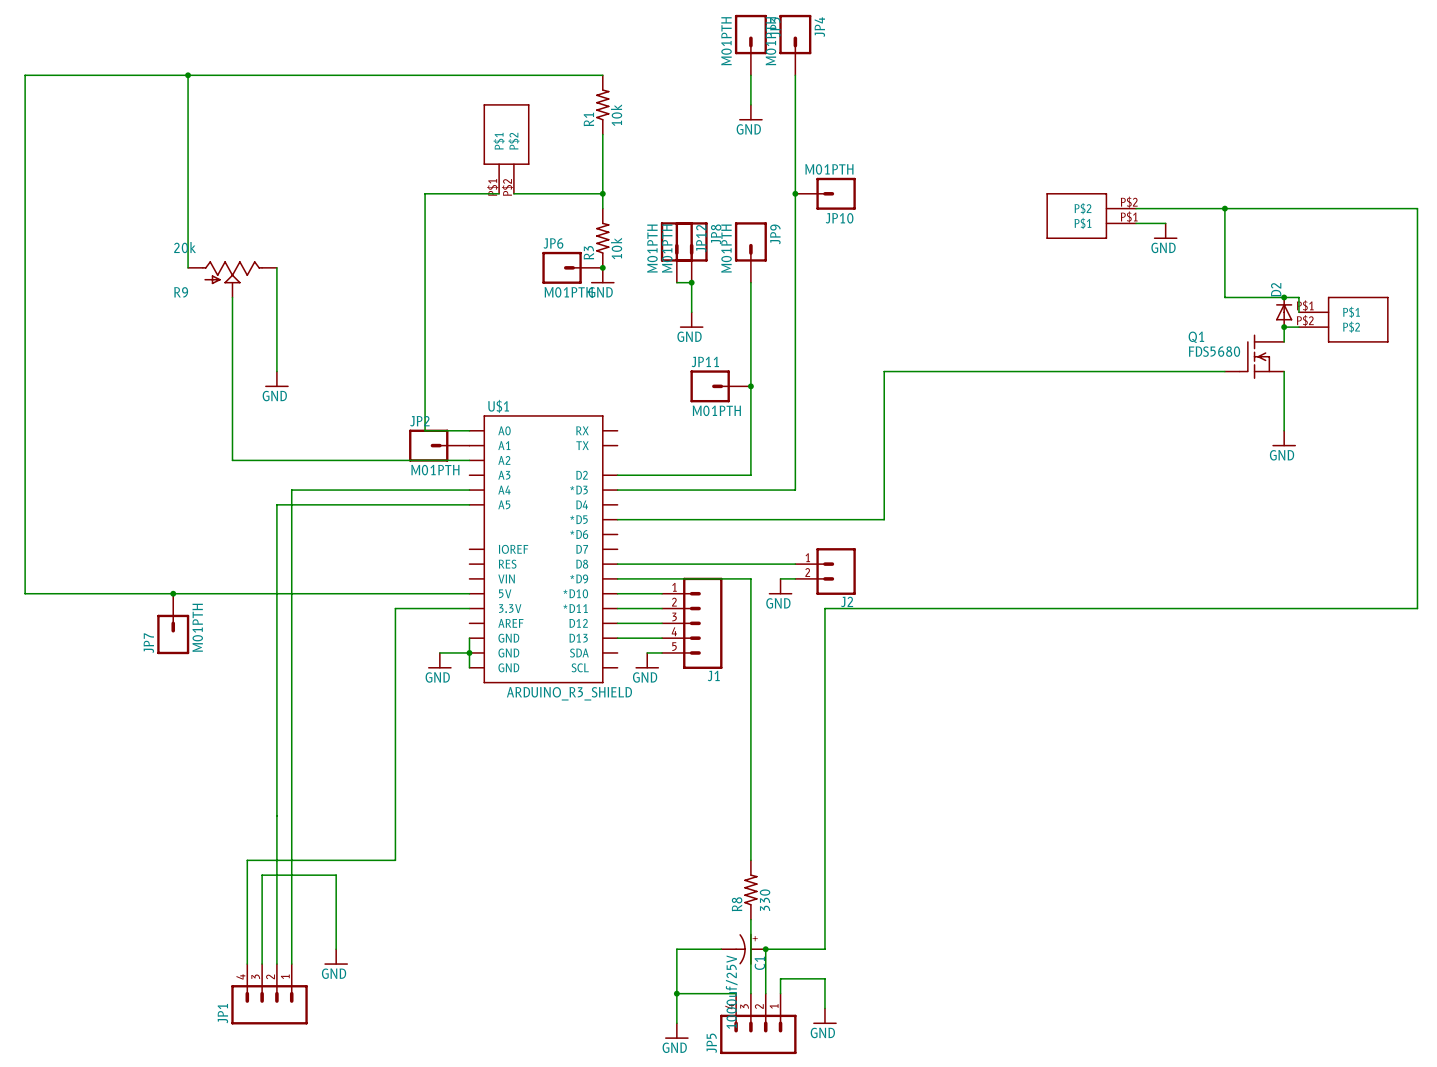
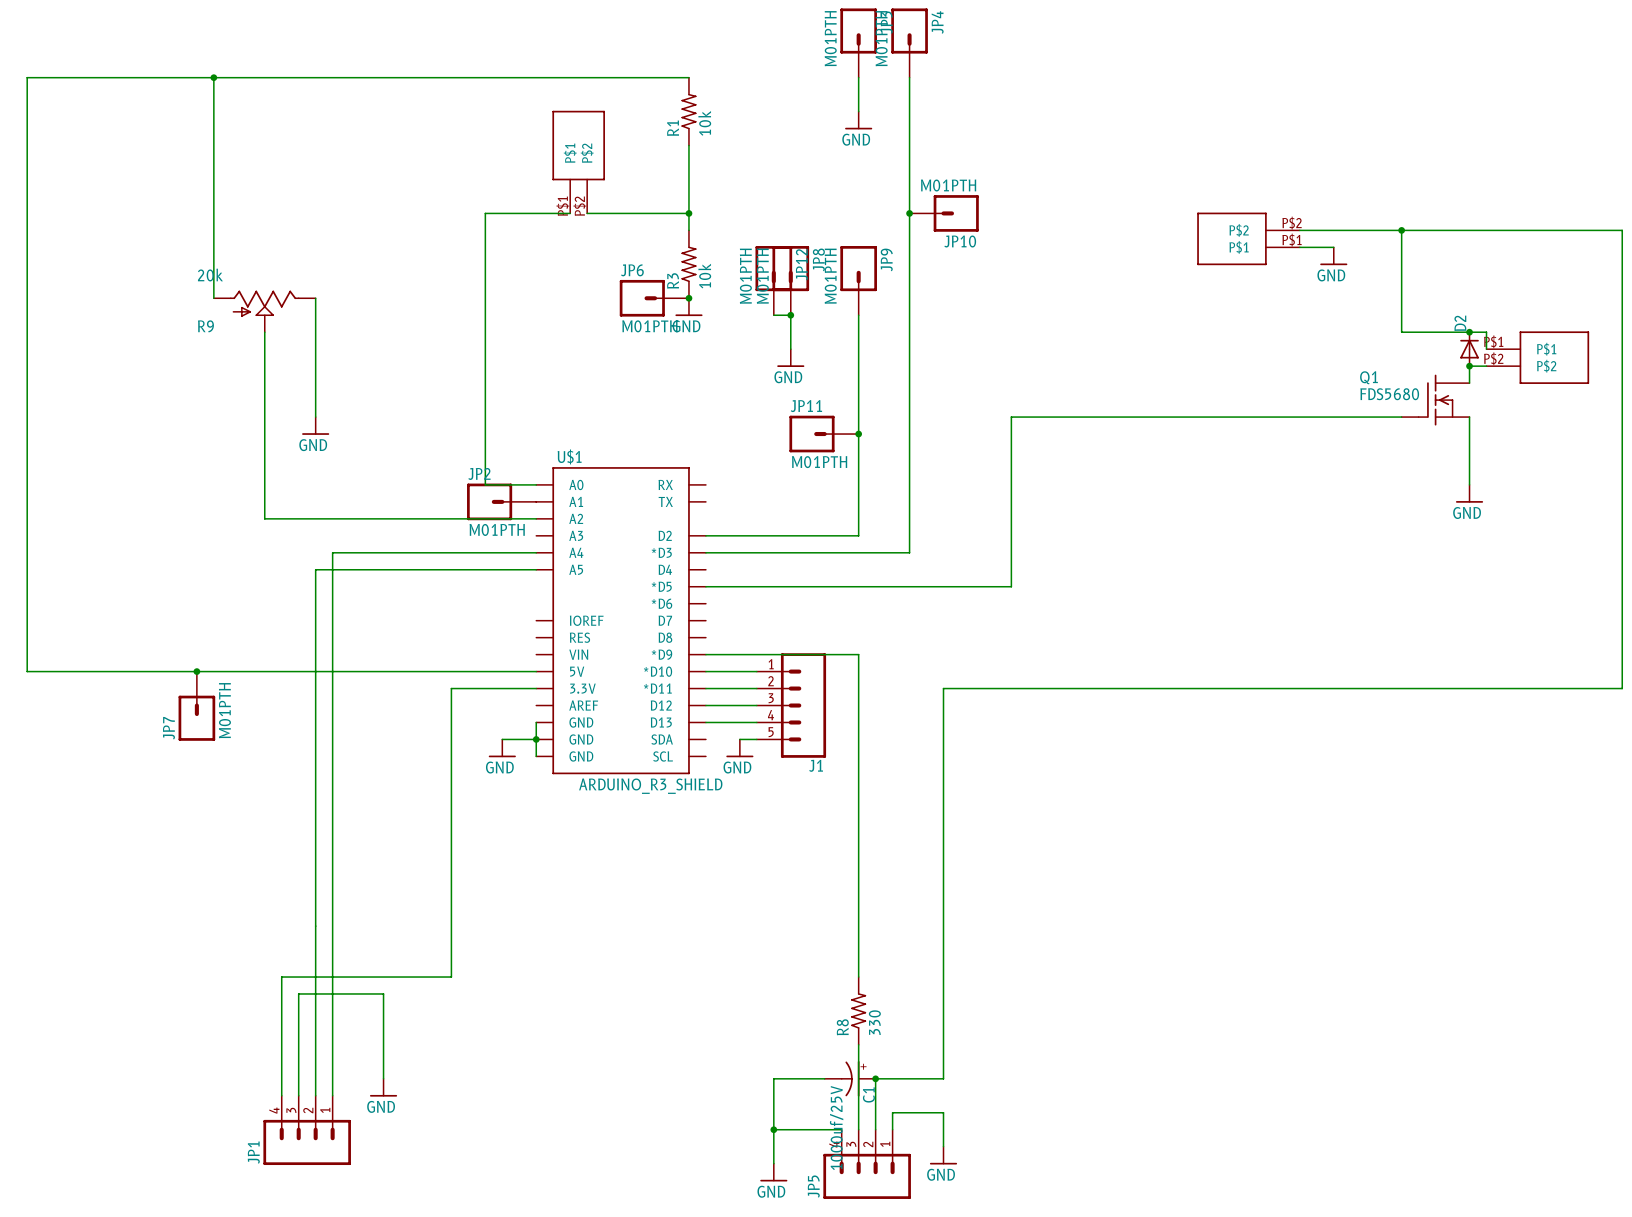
wire: (617, 564) (795, 564) -> none
J2: (825, 571) -> none
wire: (780, 578) (795, 578) -> none
power symbol: GND (780, 586) -> none

